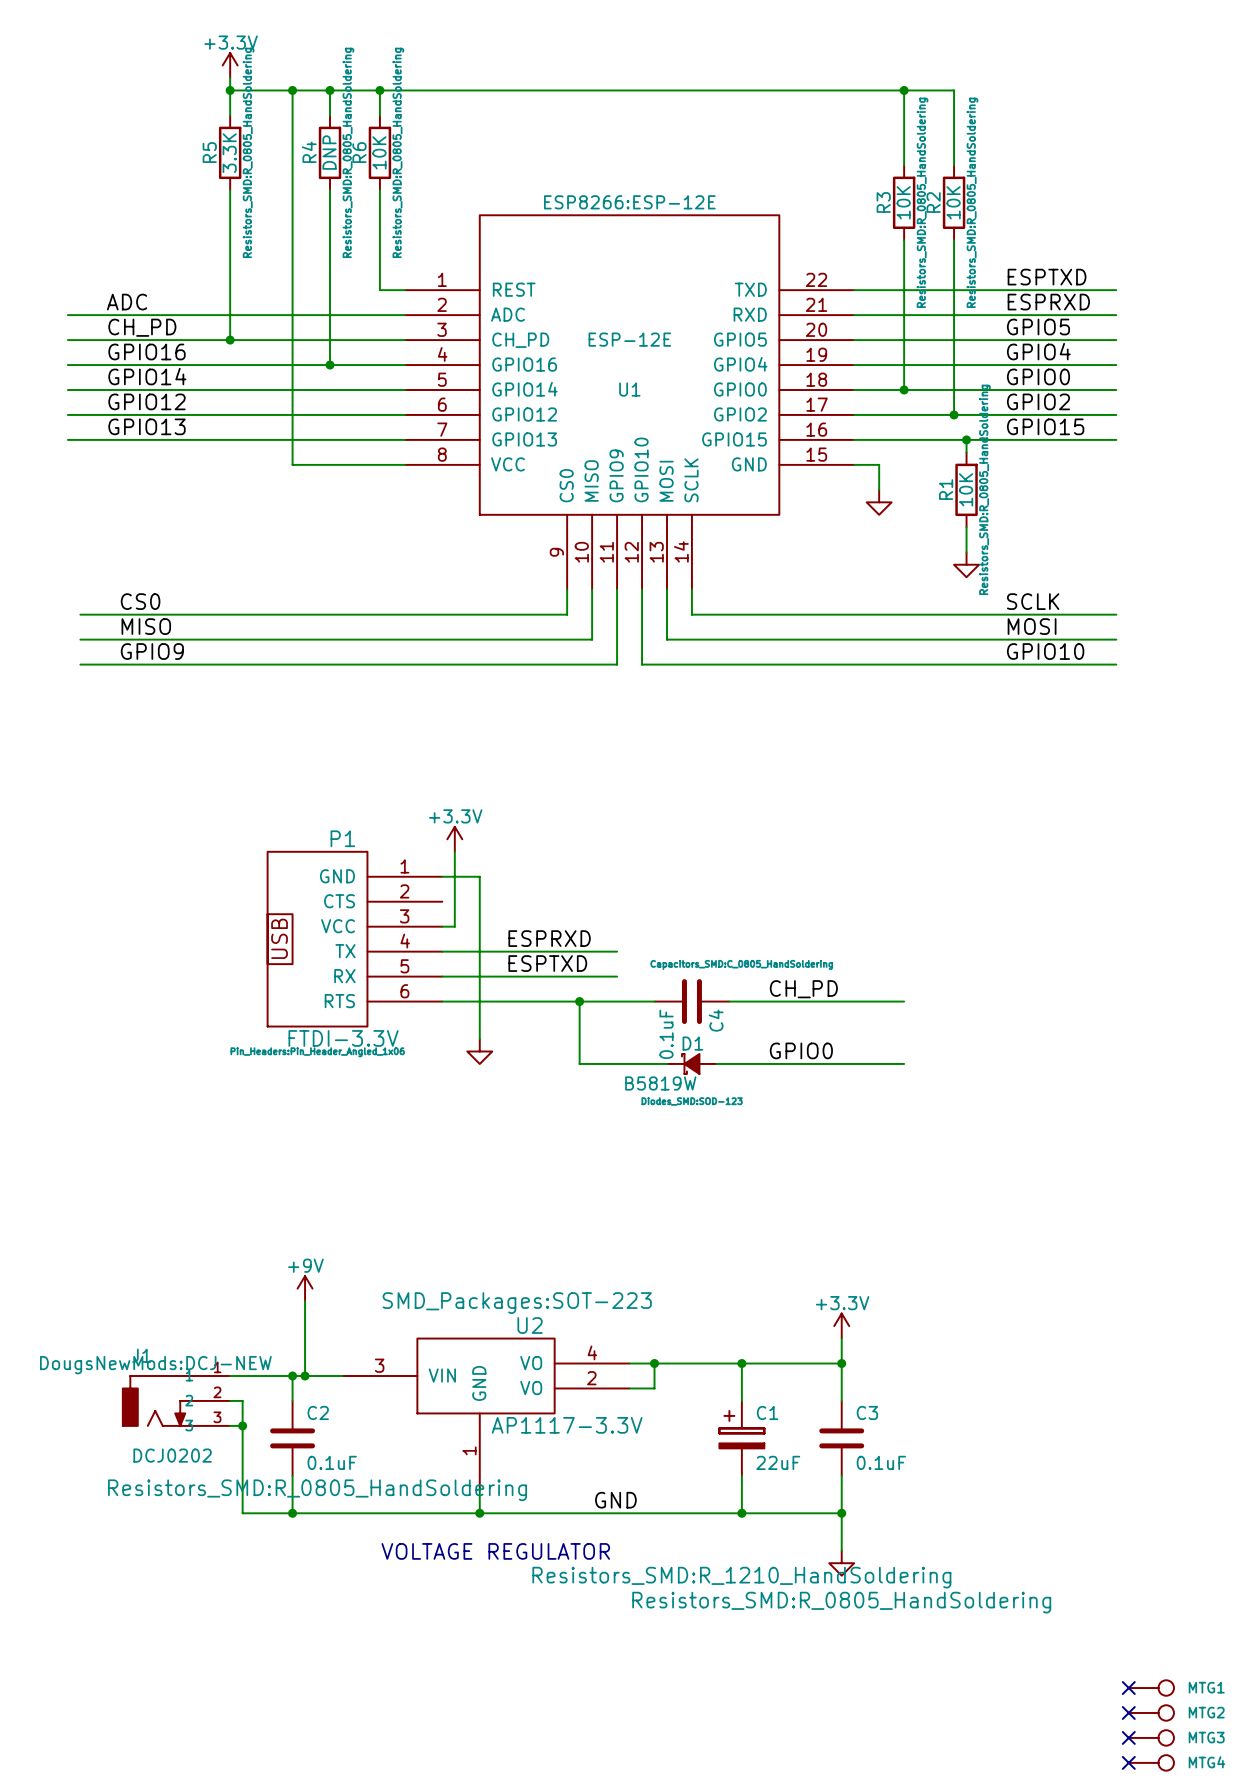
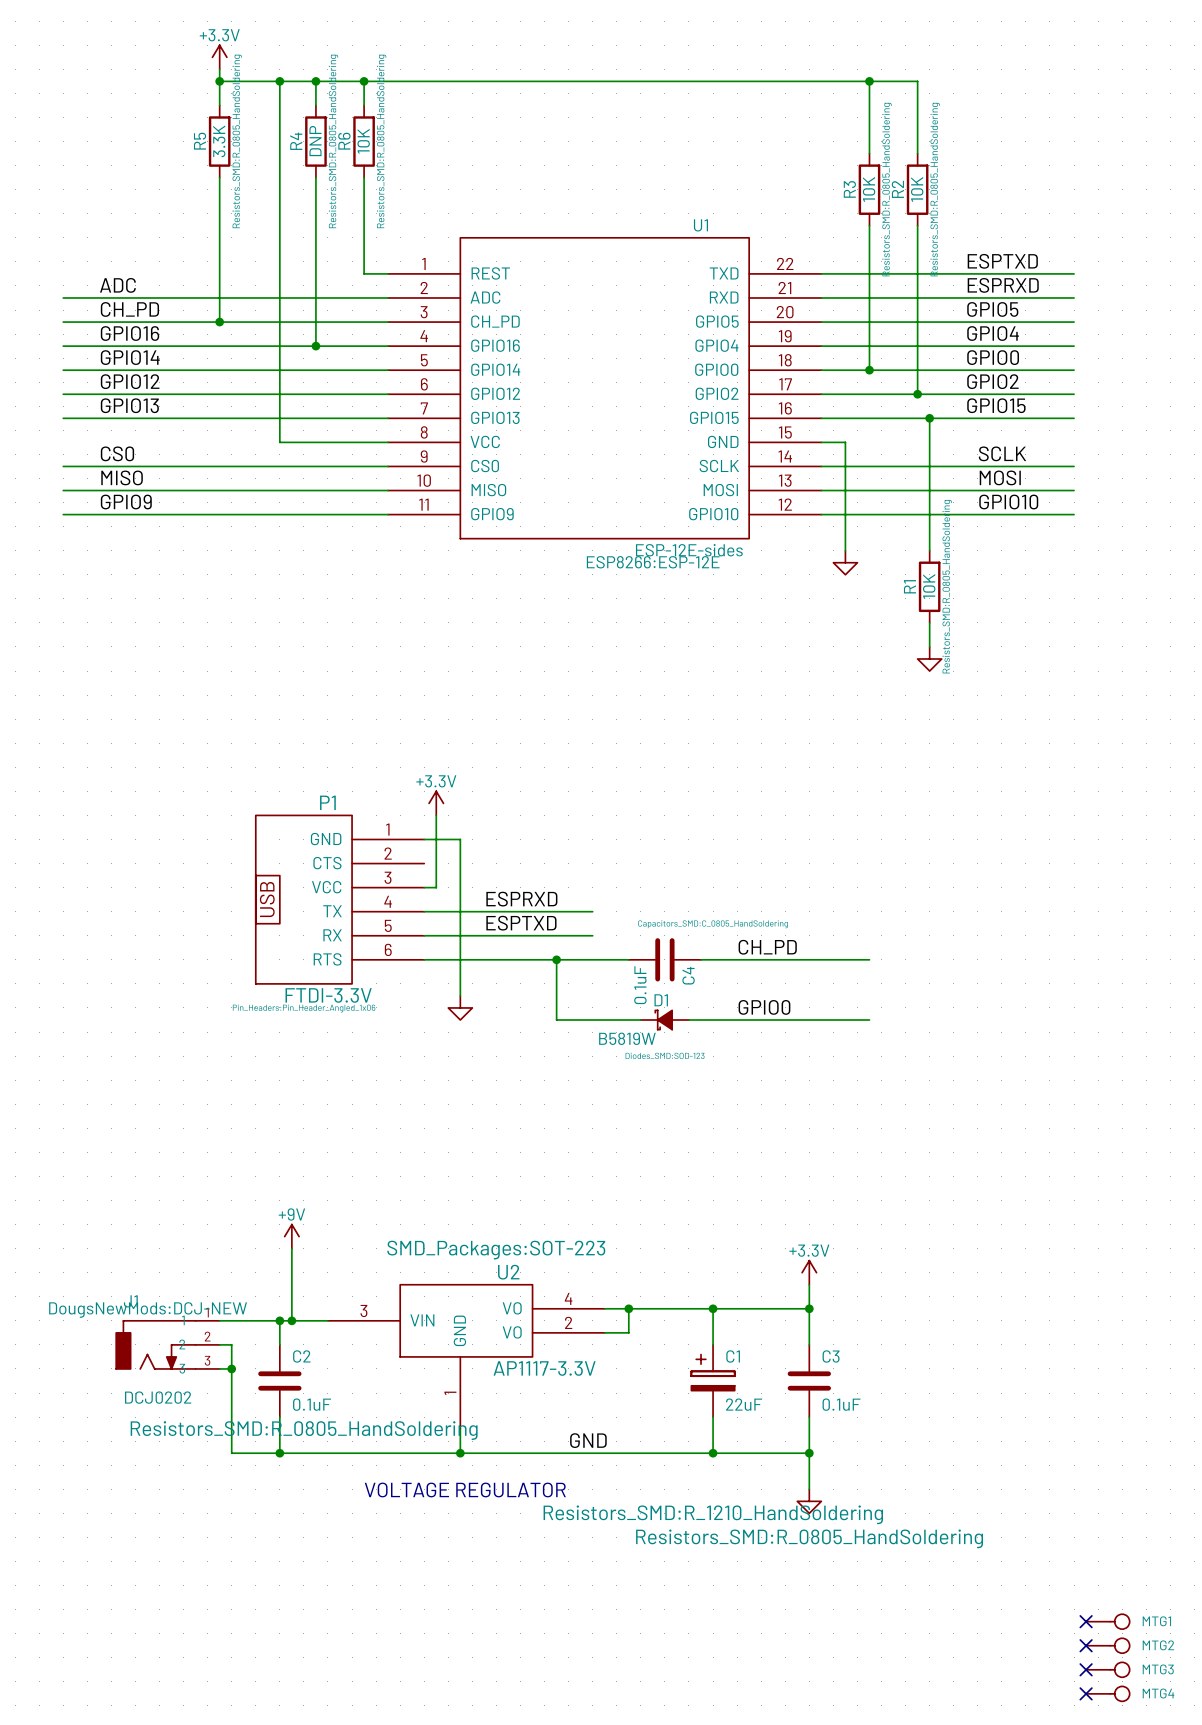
U1 text position: ESP8266:ESP-12E (629, 202) -> ESP8266:ESP-12E (653, 562)
U1 symbol: [404, 215, 855, 590] -> [388, 237, 822, 539]
U1 value: ESP-12E (629, 339) -> ESP-12E-sides (689, 550)
U1 name position: U1 (629, 389) -> U1 (700, 225)
wire: none -> (929, 430) (929, 502)
wire: none -> (63, 466) (388, 466)
wire: none -> (821, 466) (1074, 466)
wire: none -> (845, 466) (845, 550)
R1 position: (966, 489) -> (929, 586)
power symbol: (879, 502) -> none
wire: none -> (63, 490) (388, 490)
wire: none -> (821, 490) (1074, 490)
wire: none -> (63, 514) (388, 514)
wire: none -> (821, 514) (1074, 514)
power symbol: (966, 564) -> none
wire: (567, 589) (567, 614) (80, 614) -> none
wire: (592, 589) (592, 639) (80, 639) -> none
wire: (617, 589) (617, 664) (80, 664) -> none
wire: (642, 589) (642, 664) (1116, 664) -> none
wire: (666, 589) (666, 639) (1116, 639) -> none
wire: (691, 589) (691, 614) (1116, 614) -> none
power symbol: none -> (845, 562)
label position: CS0 (140, 601) -> CS0 (117, 453)
label position: SCLK (1033, 601) -> SCLK (1002, 453)
label position: MISO (146, 626) -> MISO (122, 477)
label position: MOSI (1032, 626) -> MOSI (1000, 477)
label position: GPIO9 (152, 651) -> GPIO9 (126, 501)
label position: GPIO10 (1045, 651) -> GPIO10 (1008, 502)
wire: none -> (929, 622) (929, 646)
power symbol: none -> (929, 658)

